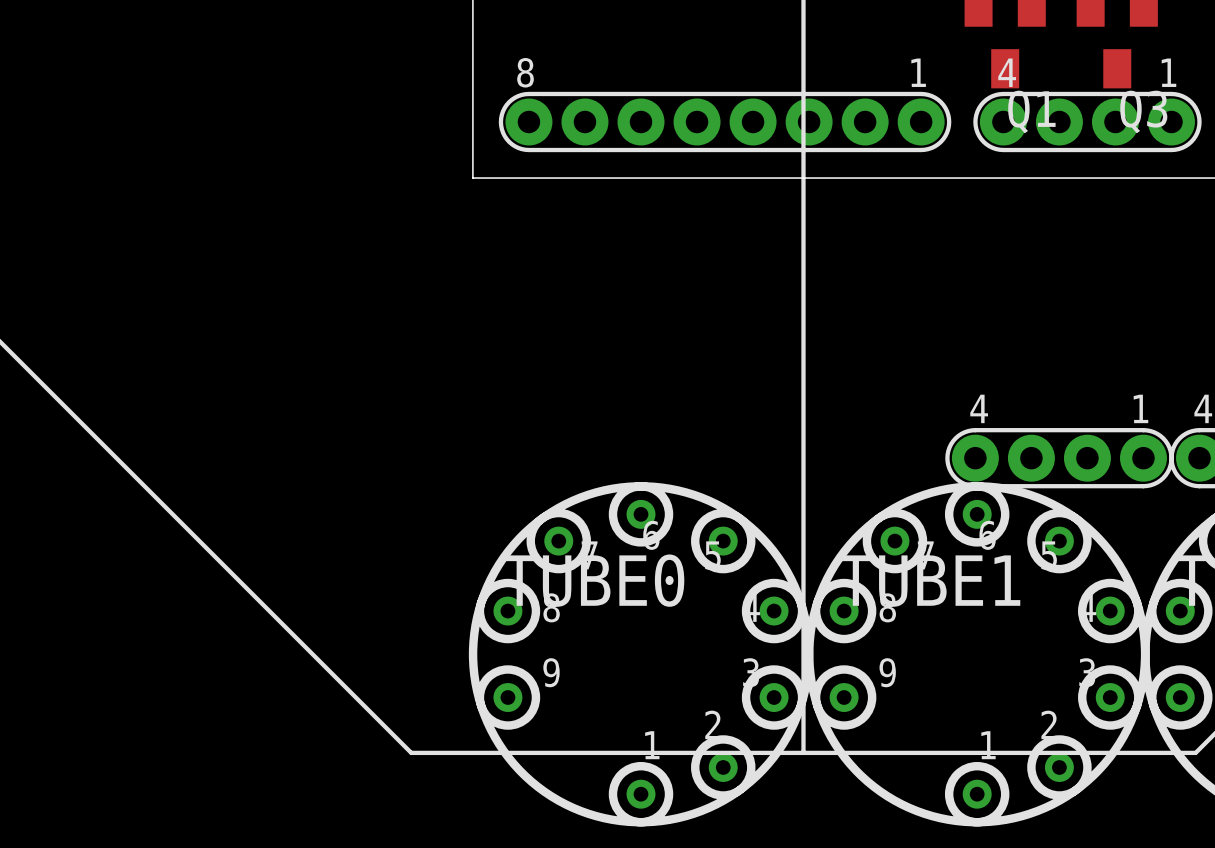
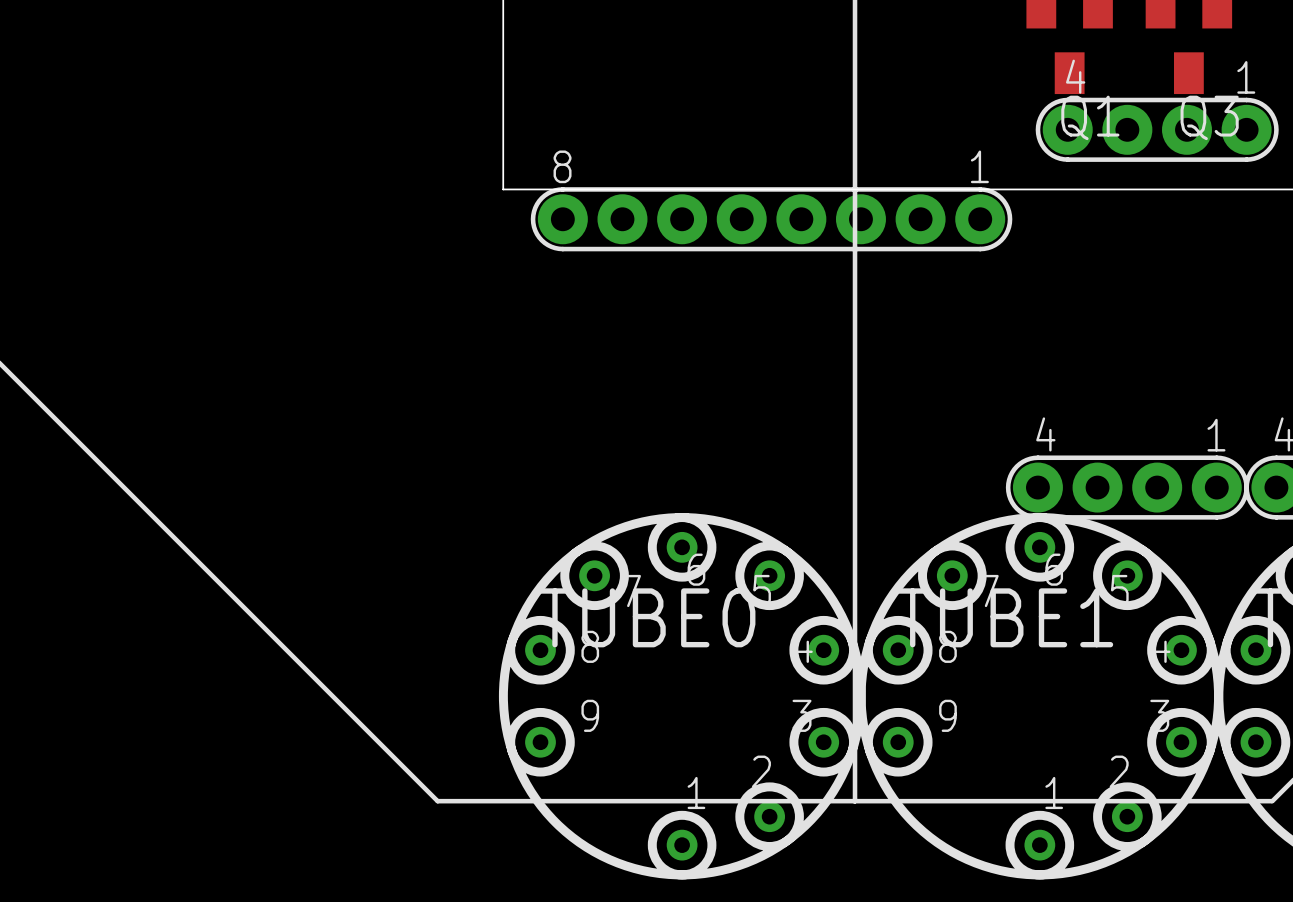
part position: (725, 122) -> (771, 219)

